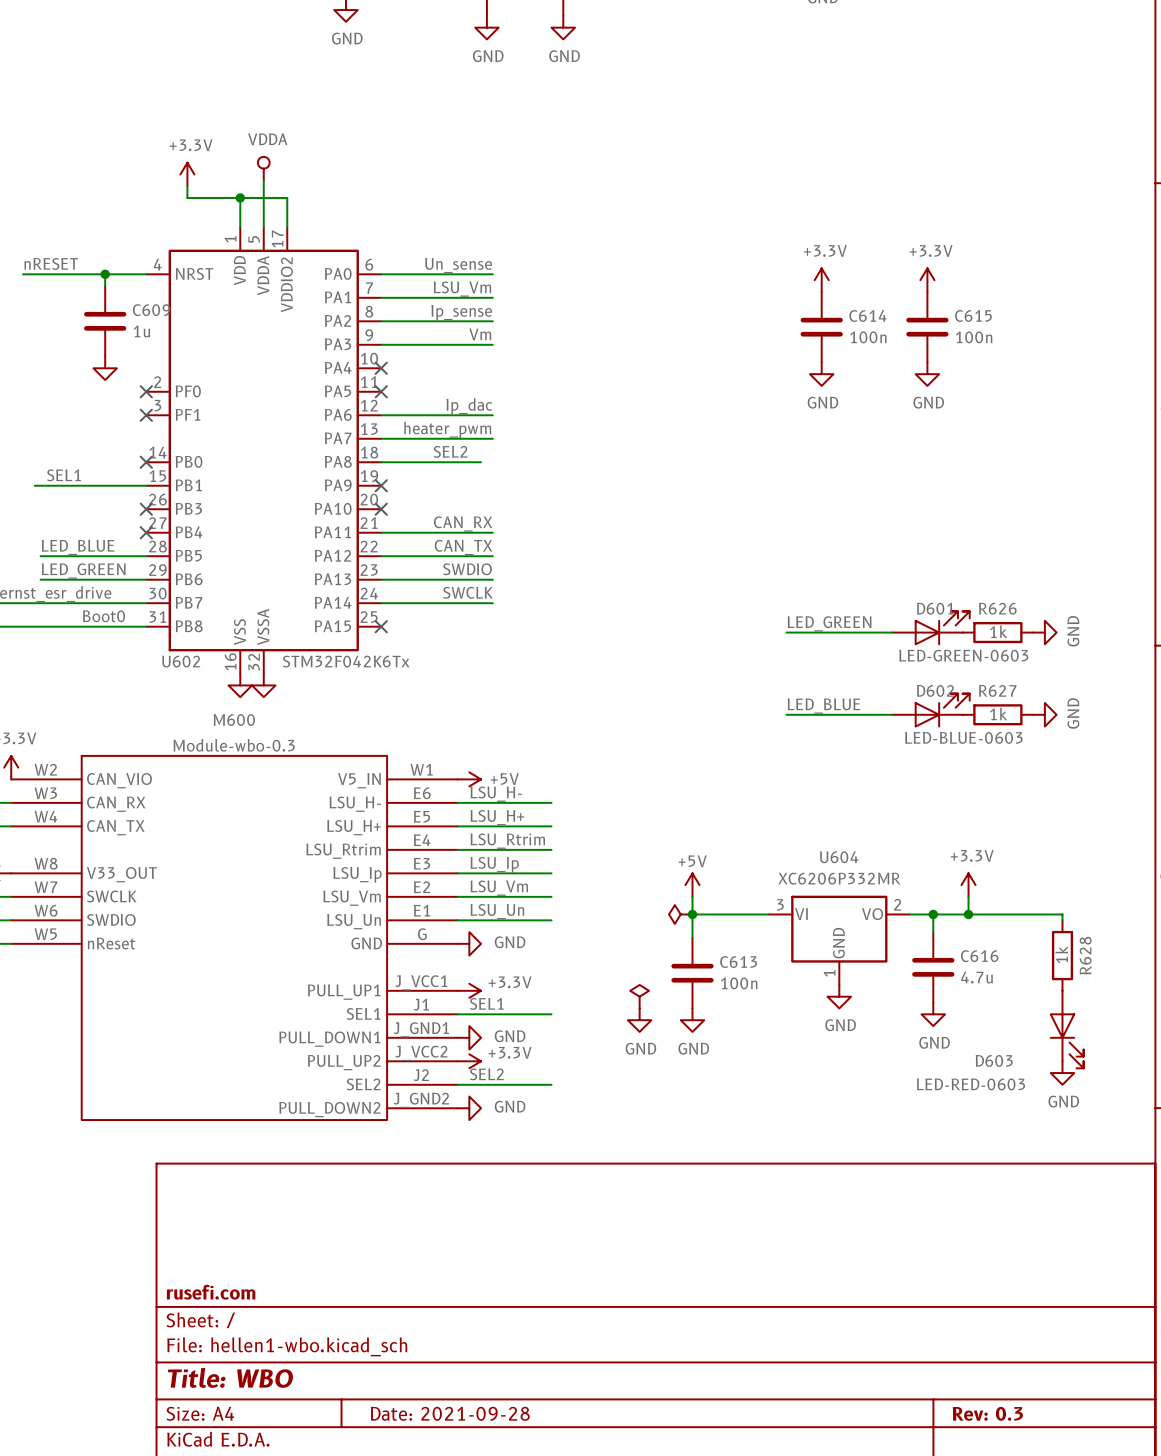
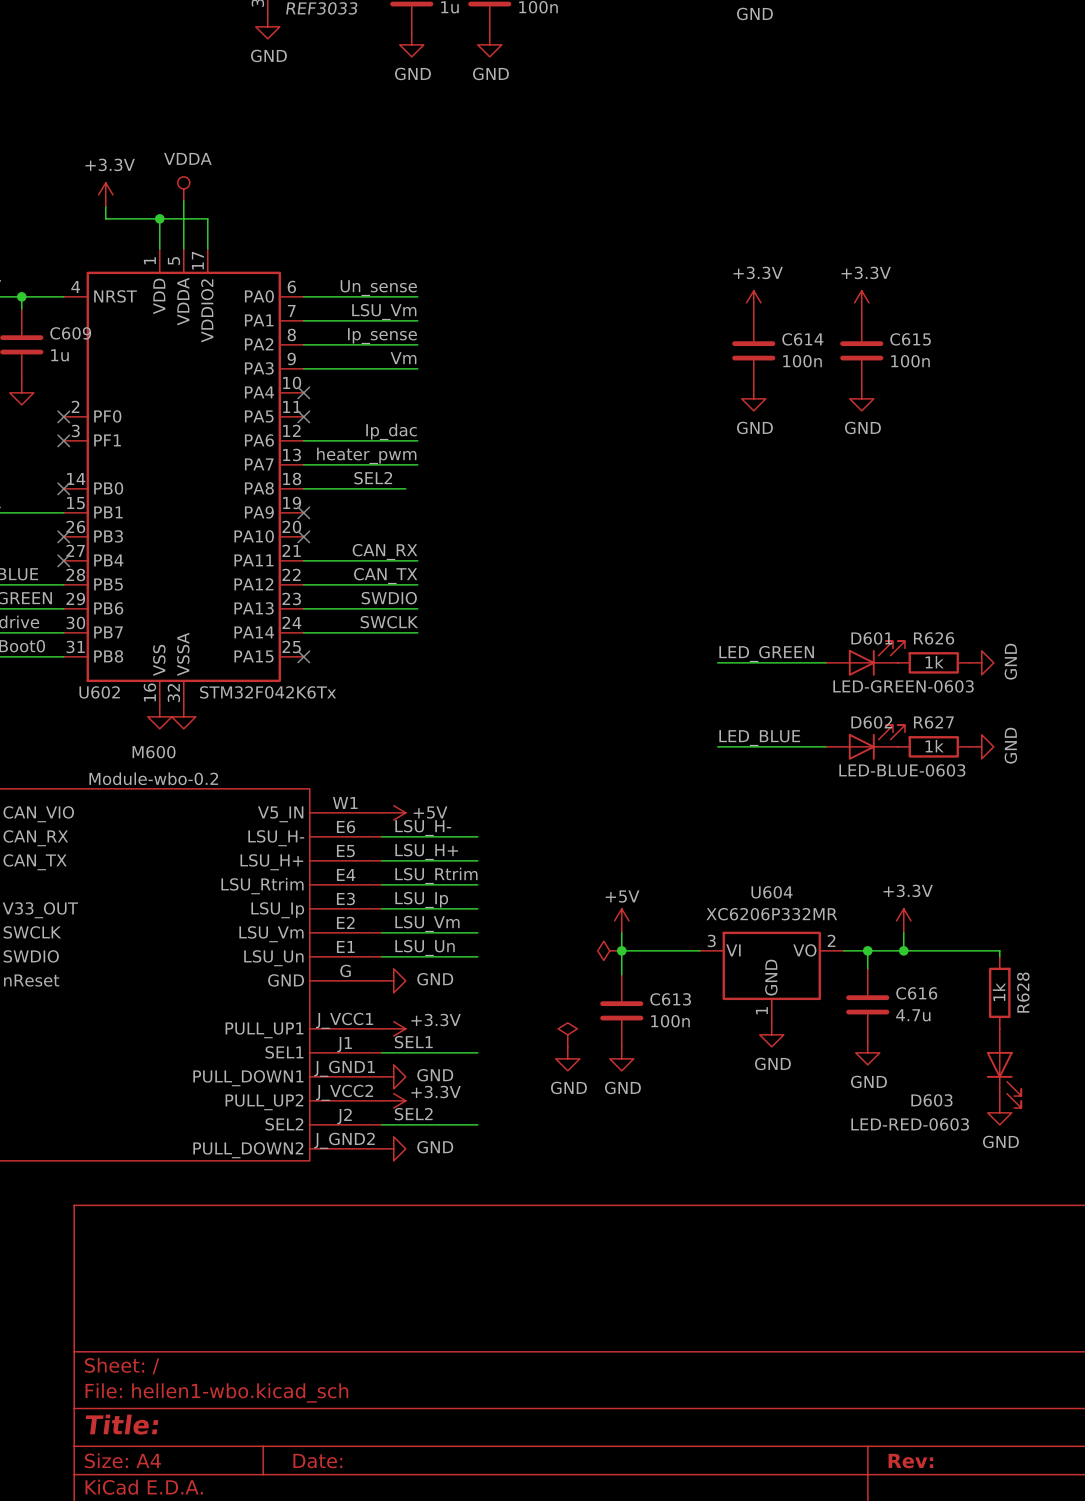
M600 value: Module-wbo-0.3 (234, 745) -> Module-wbo-0.2 (153, 778)
title block: rusefi.com (211, 1292) -> none
title block: Title: WBO (230, 1377) -> Title: (122, 1424)
title block: Date: 2021-09-28 (450, 1413) -> Date: (317, 1461)
title block: Rev: 0.3 (987, 1413) -> Rev: (910, 1461)

